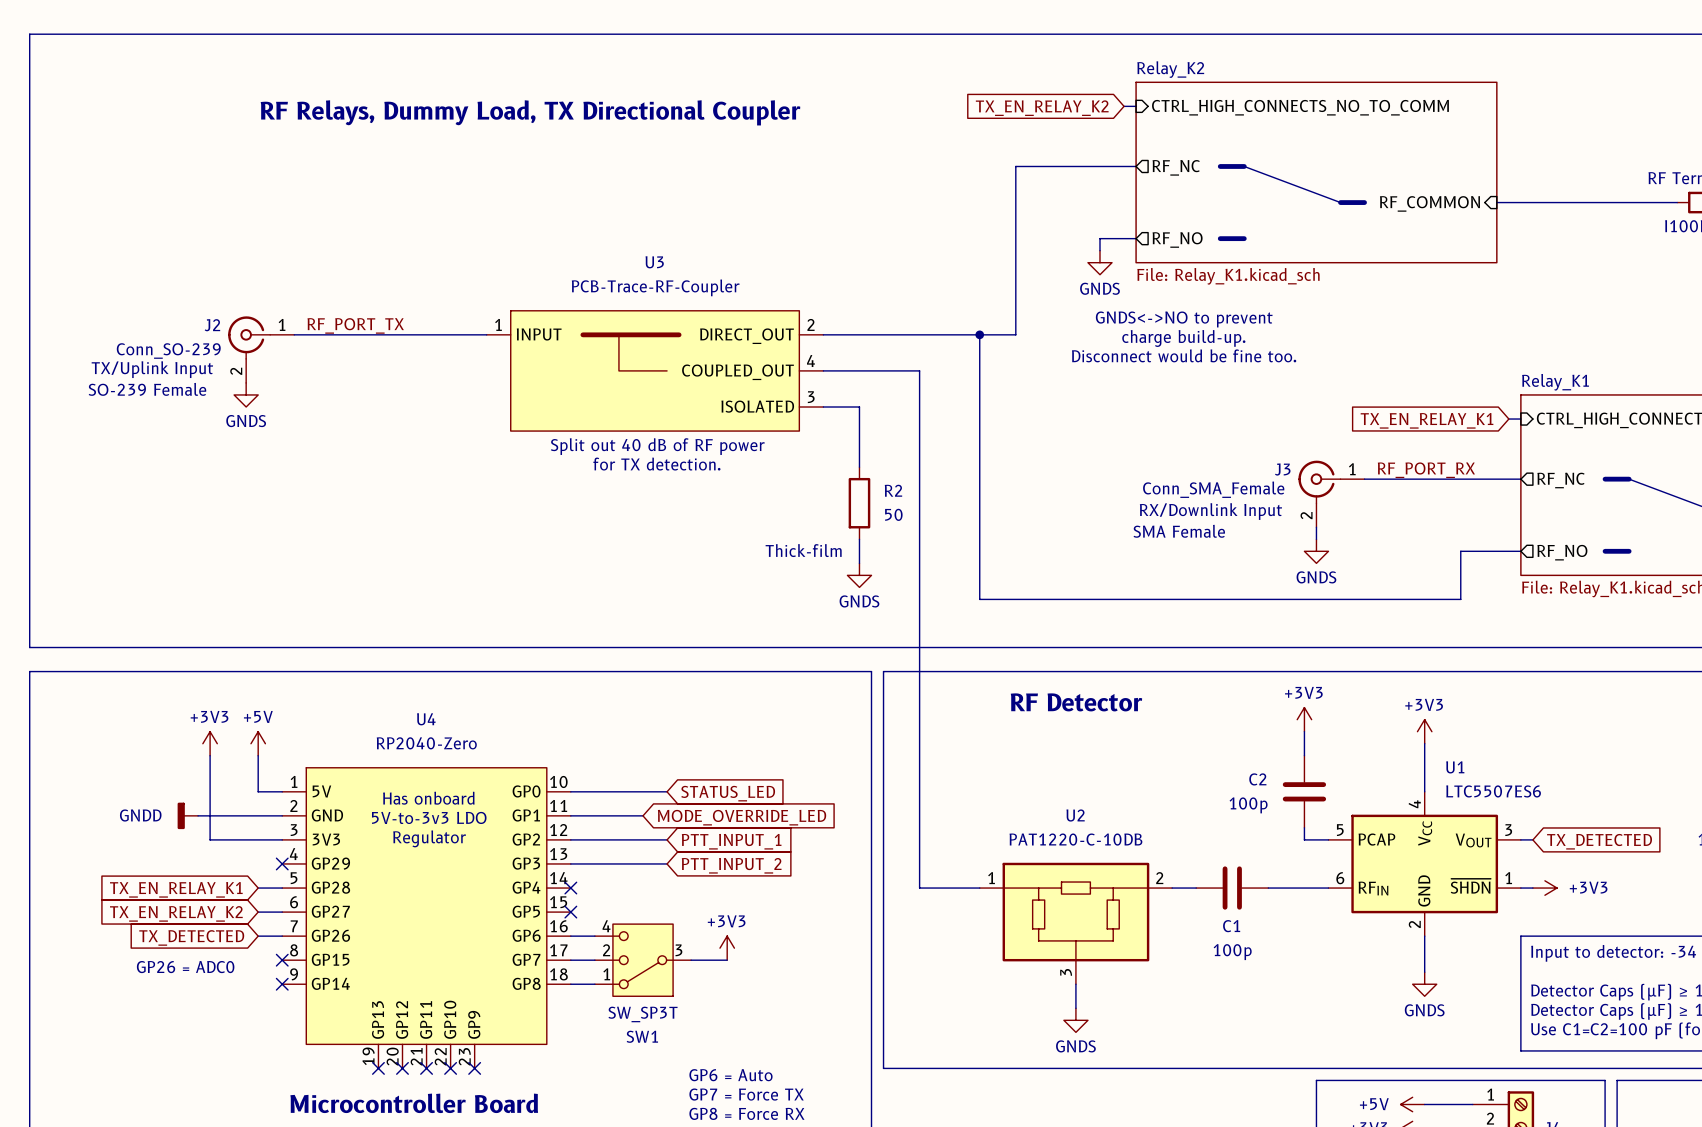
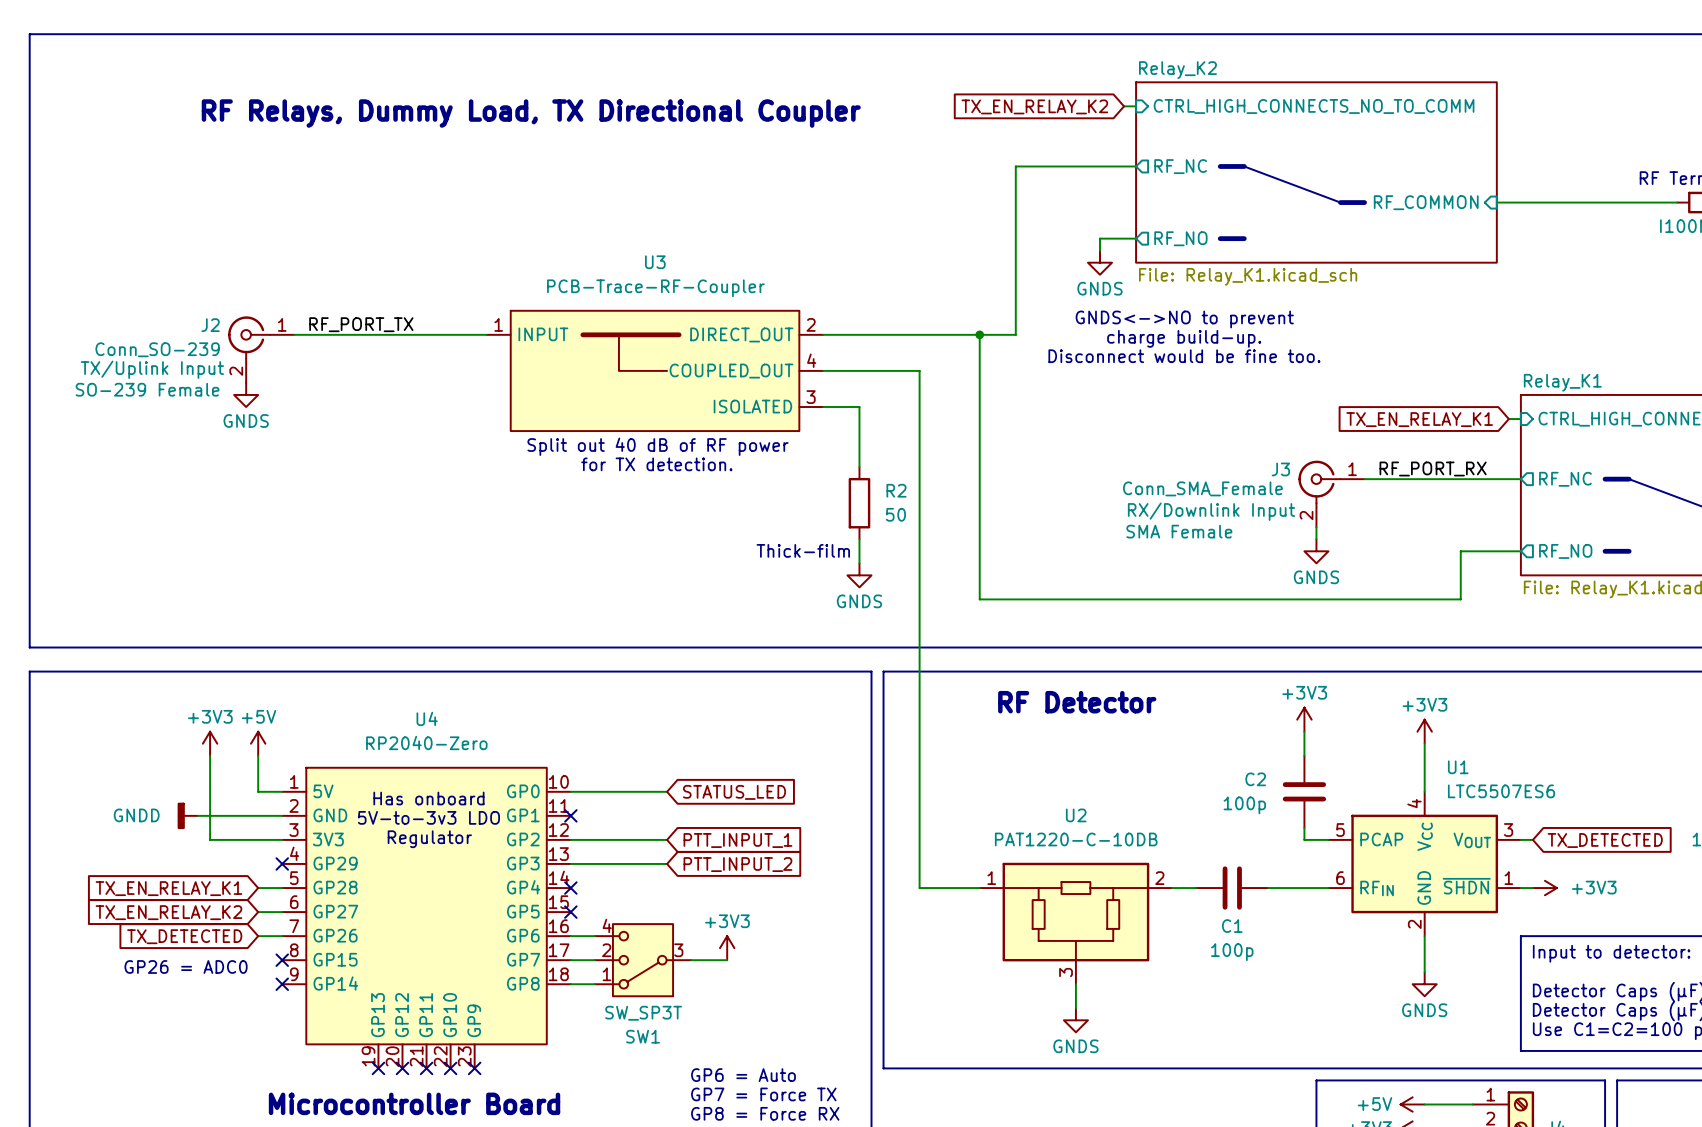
wire: (570, 815) (643, 815) -> none
no-connect mark: none -> (570, 815)
global label: MODE_OVERRIDE_LED (742, 817) -> none

